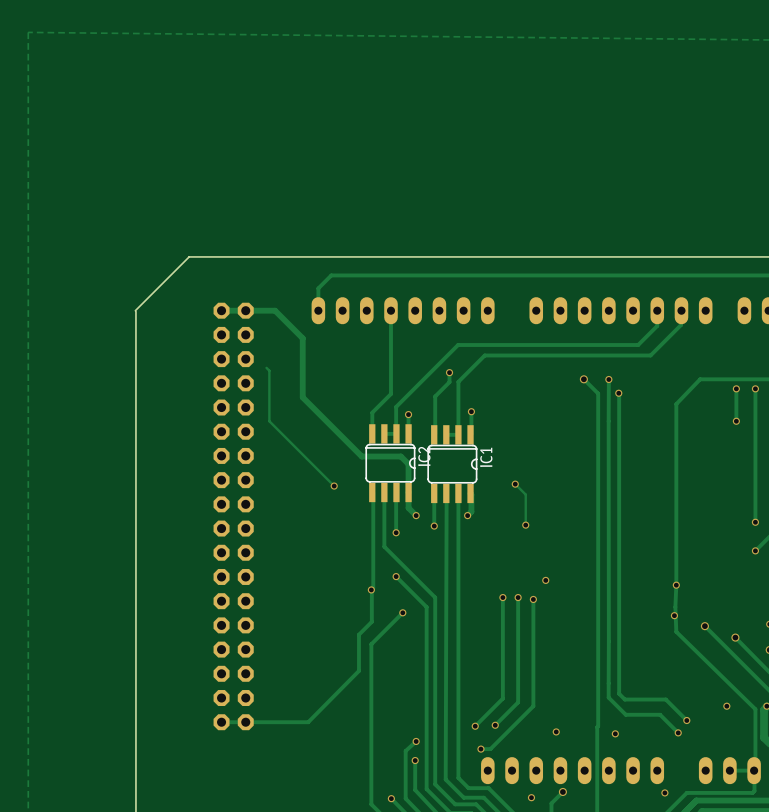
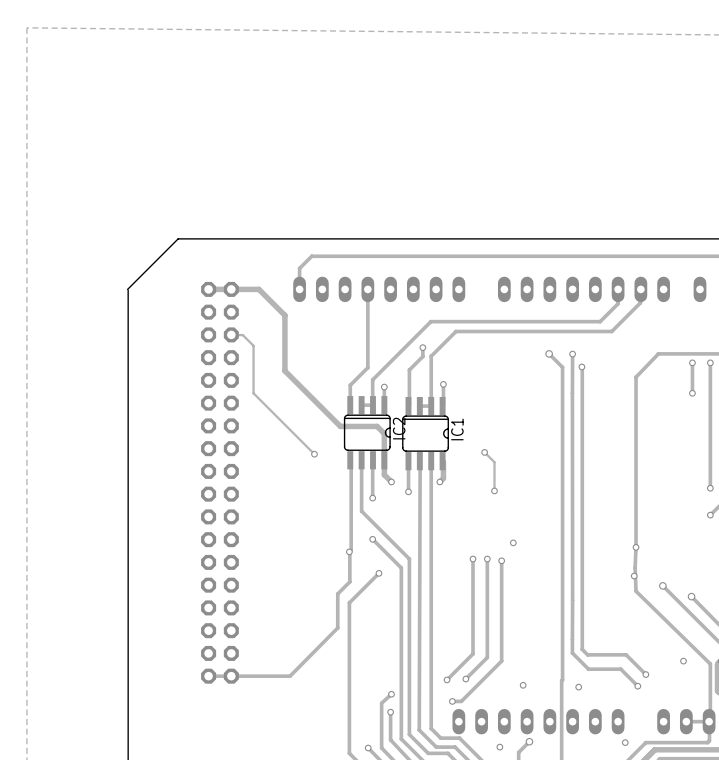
track: none -> (231, 335) (242, 335) (250, 343)

